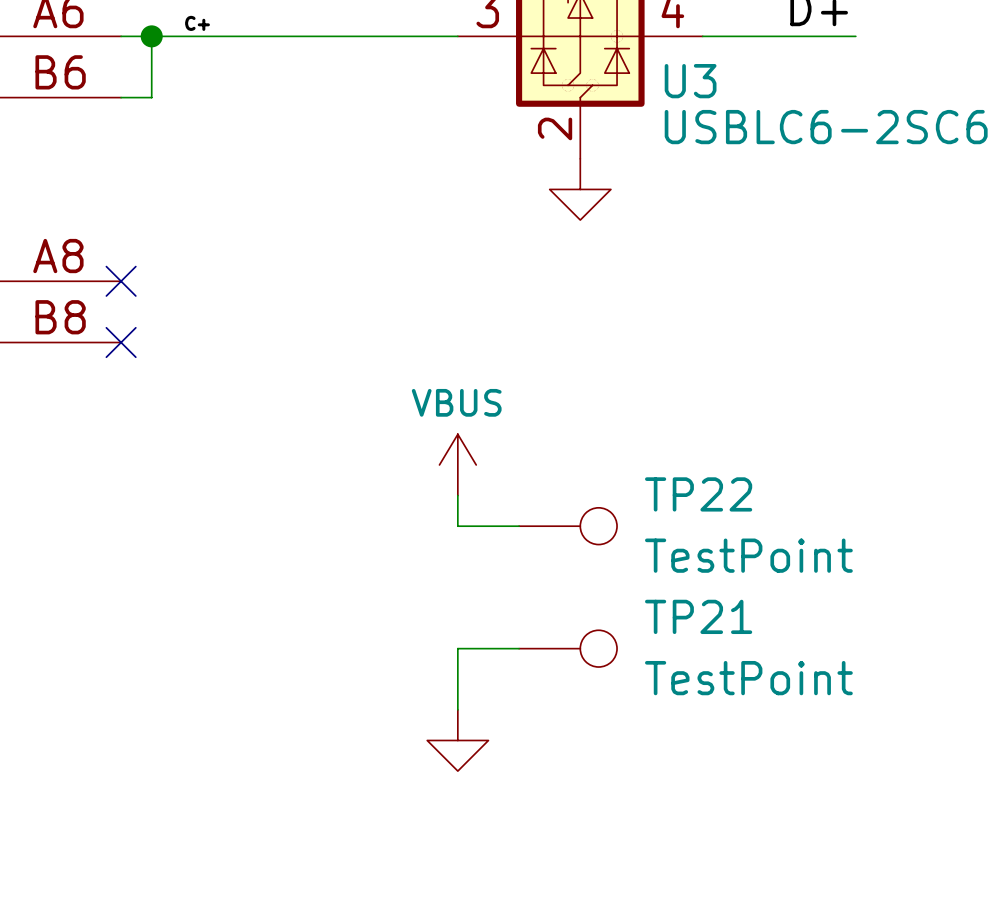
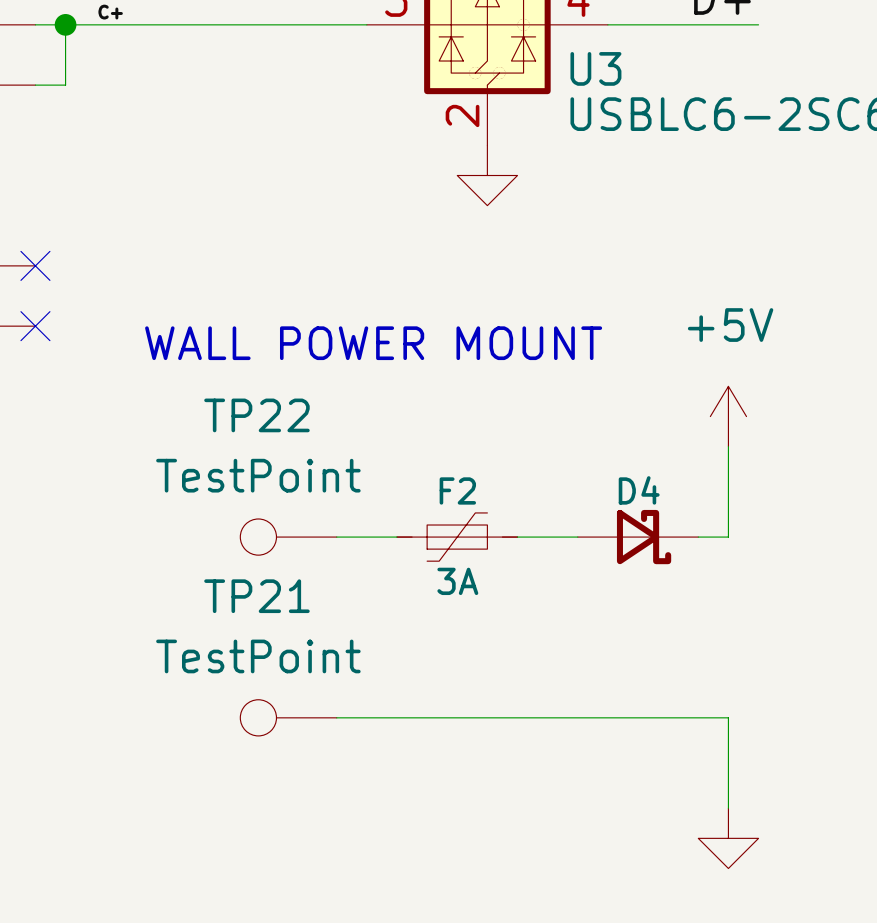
text: none -> WALL POWER MOUNT (373, 343)
power symbol: none -> +5V (728, 416)
power symbol: VBUS (457, 464) -> none
wire: none -> (728, 446) (728, 537) (698, 537)
TP22 name position: TP22 (698, 494) -> TP22 (256, 415)
wire: (457, 495) (457, 526) (519, 526) -> none
TP22 position: (568, 526) -> (288, 537)
TP22 rotation: 0° (598, 526) -> 180° (258, 537)
TP22 value position: TestPoint (748, 555) -> TestPoint (258, 475)
wire: none -> (336, 537) (397, 537)
F2: none -> 3A (457, 537)
wire: none -> (517, 537) (577, 537)
D4: none -> (638, 537)
TP21 name position: TP21 (698, 616) -> TP21 (256, 596)
wire: (519, 648) (457, 648) (457, 709) -> none
TP21 position: (568, 648) -> (288, 717)
TP21 rotation: 0° (598, 648) -> 180° (258, 717)
TP21 value position: TestPoint (748, 678) -> TestPoint (258, 656)
wire: none -> (336, 717) (728, 717) (728, 808)
power symbol position: (457, 740) -> (728, 838)

